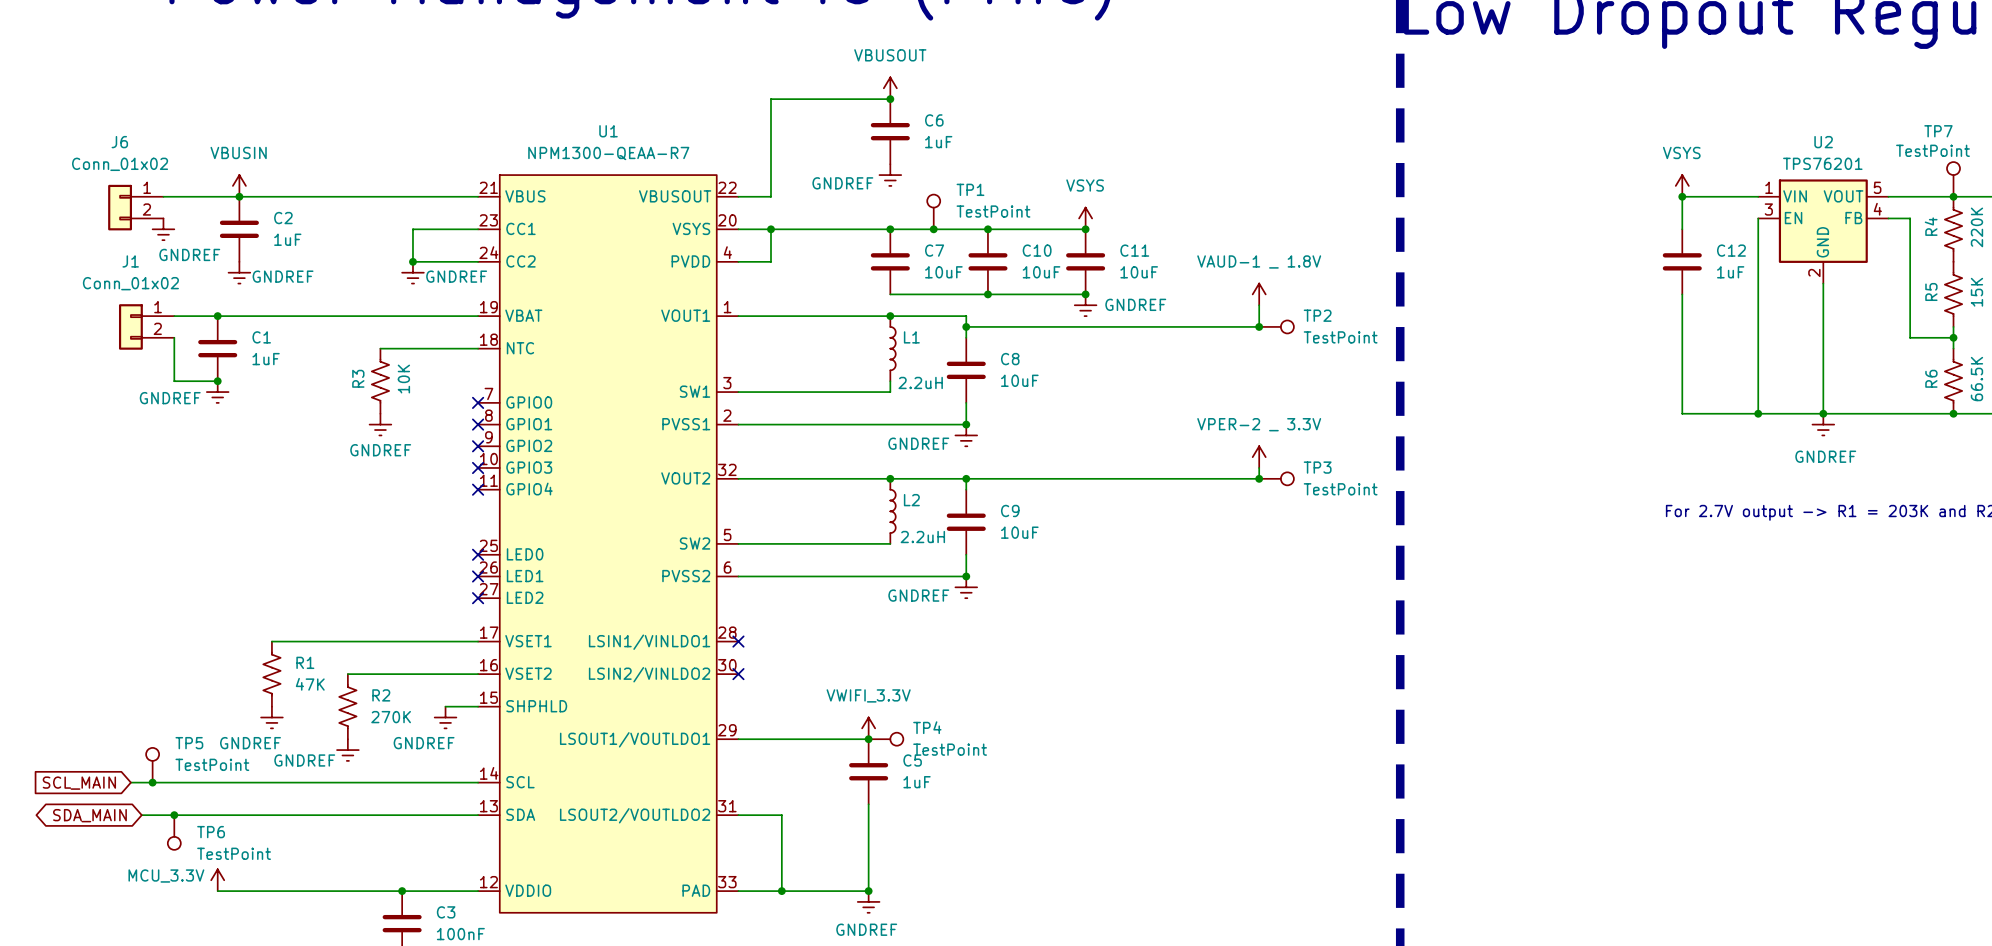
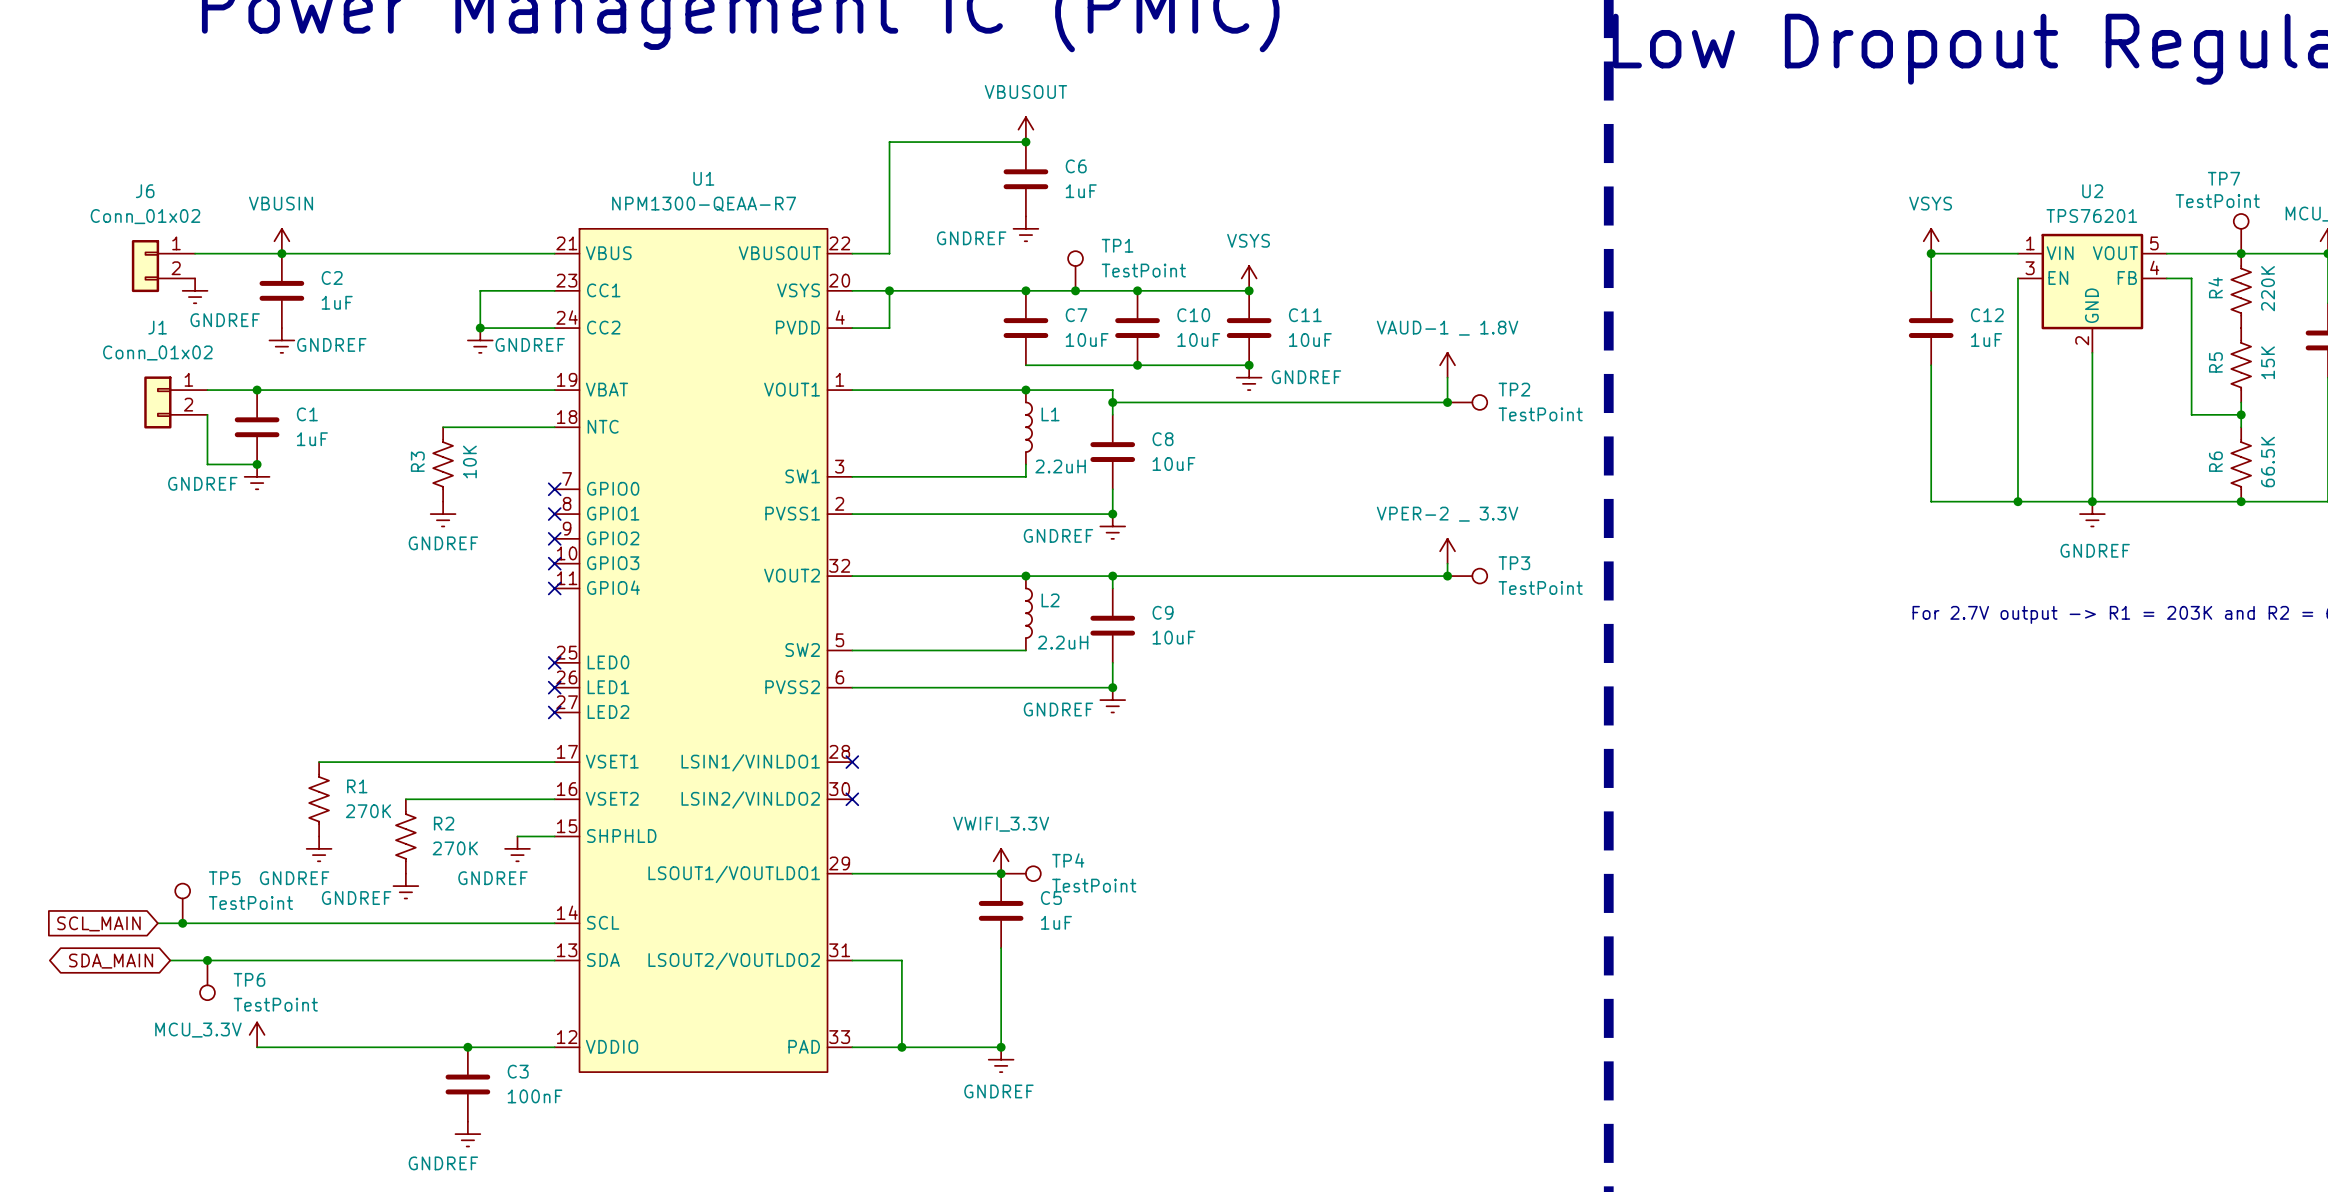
R1 value: 47K (310, 684) -> 270K (368, 811)

